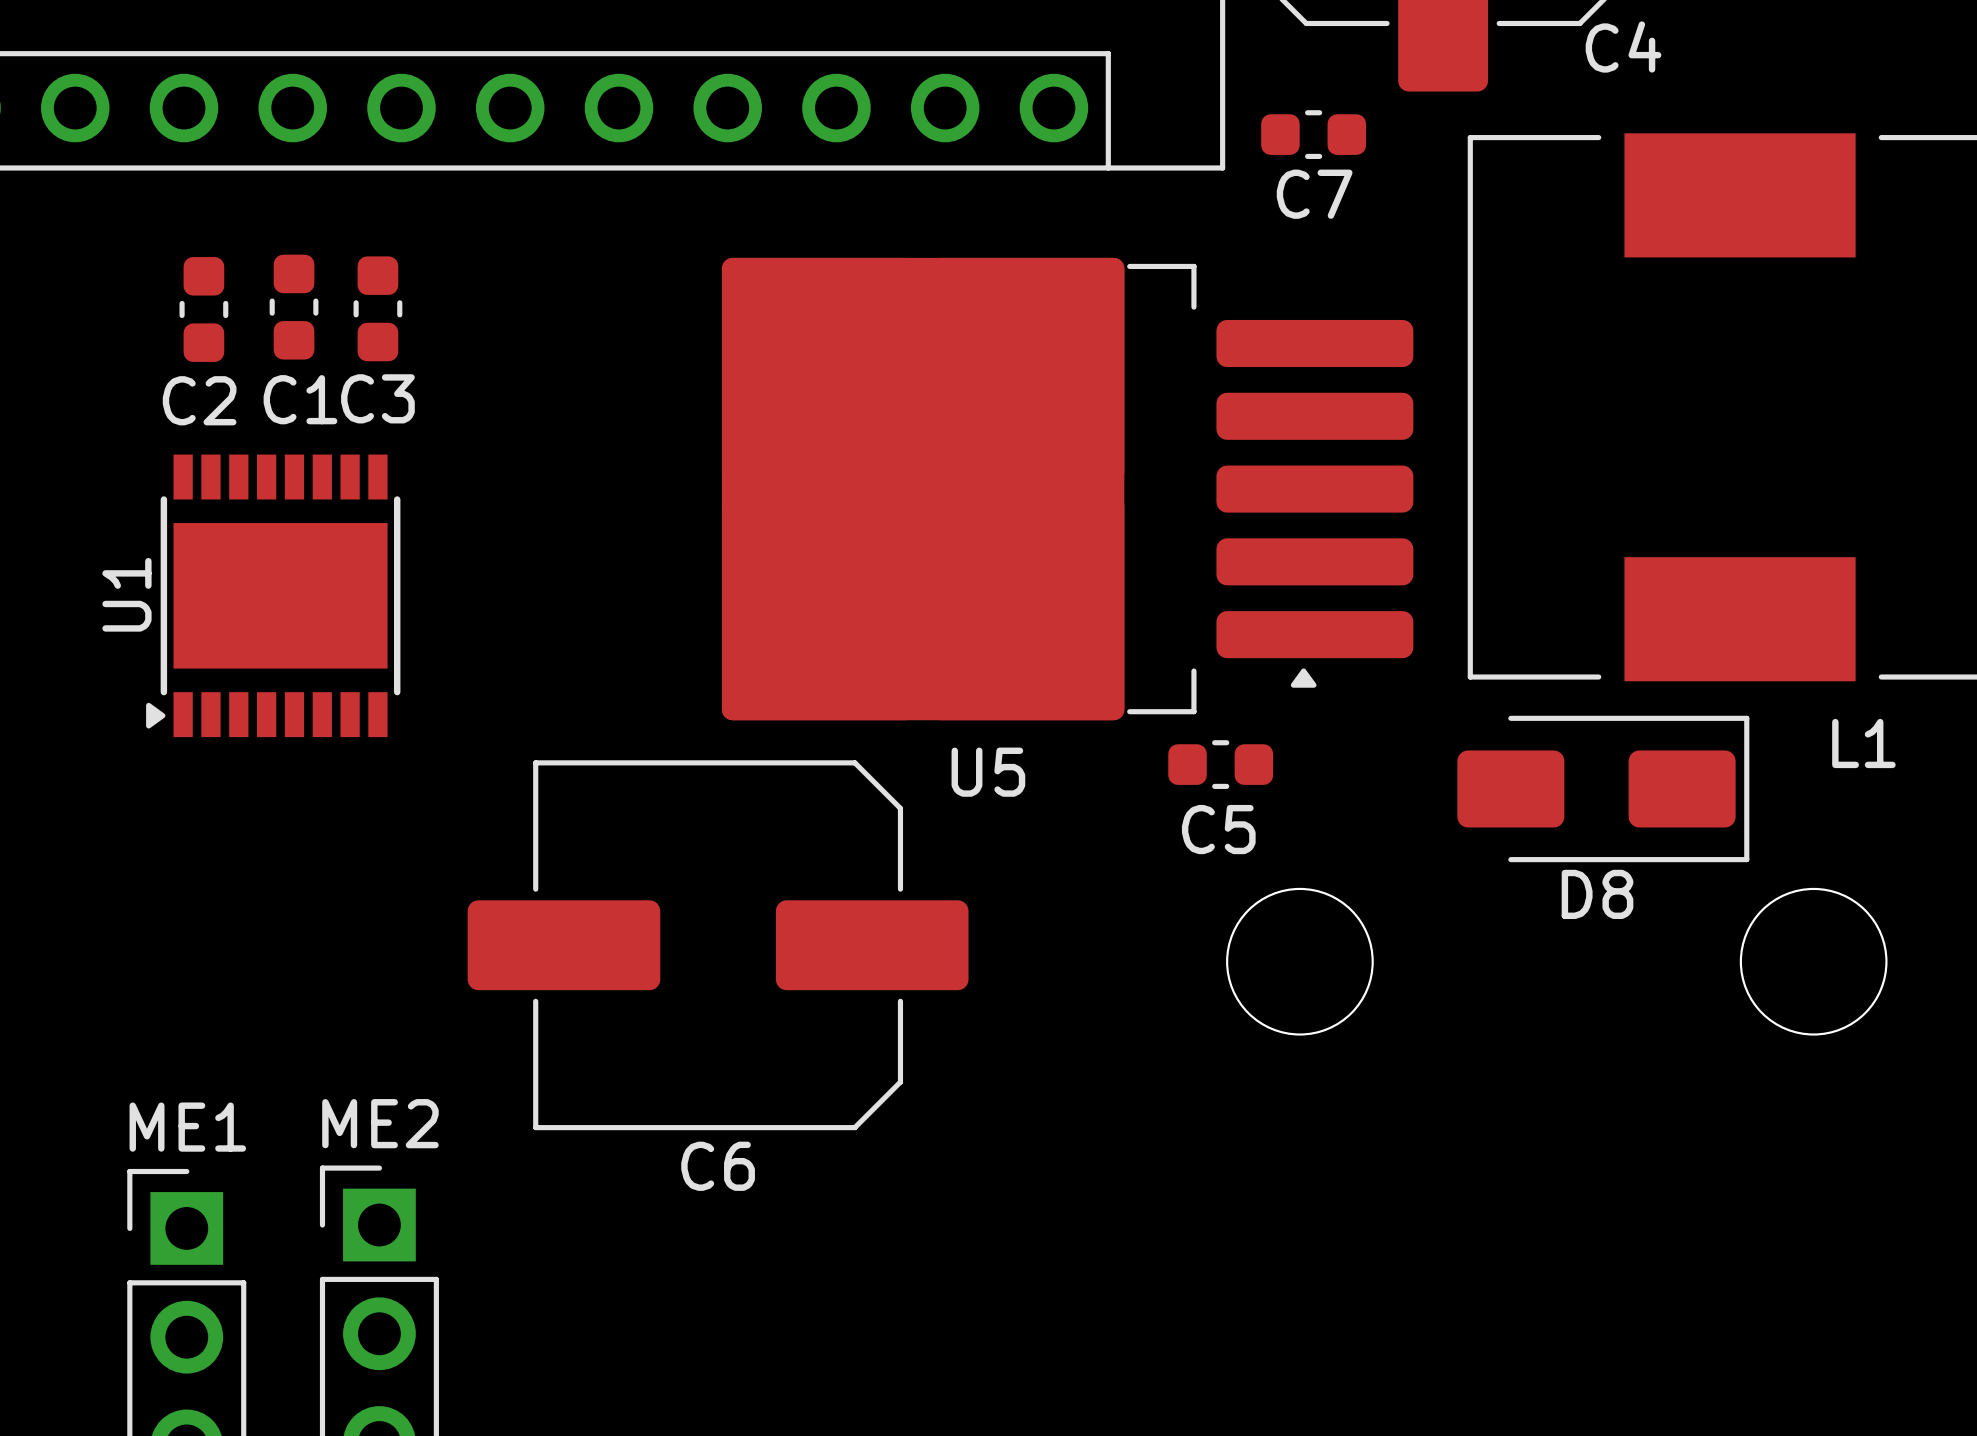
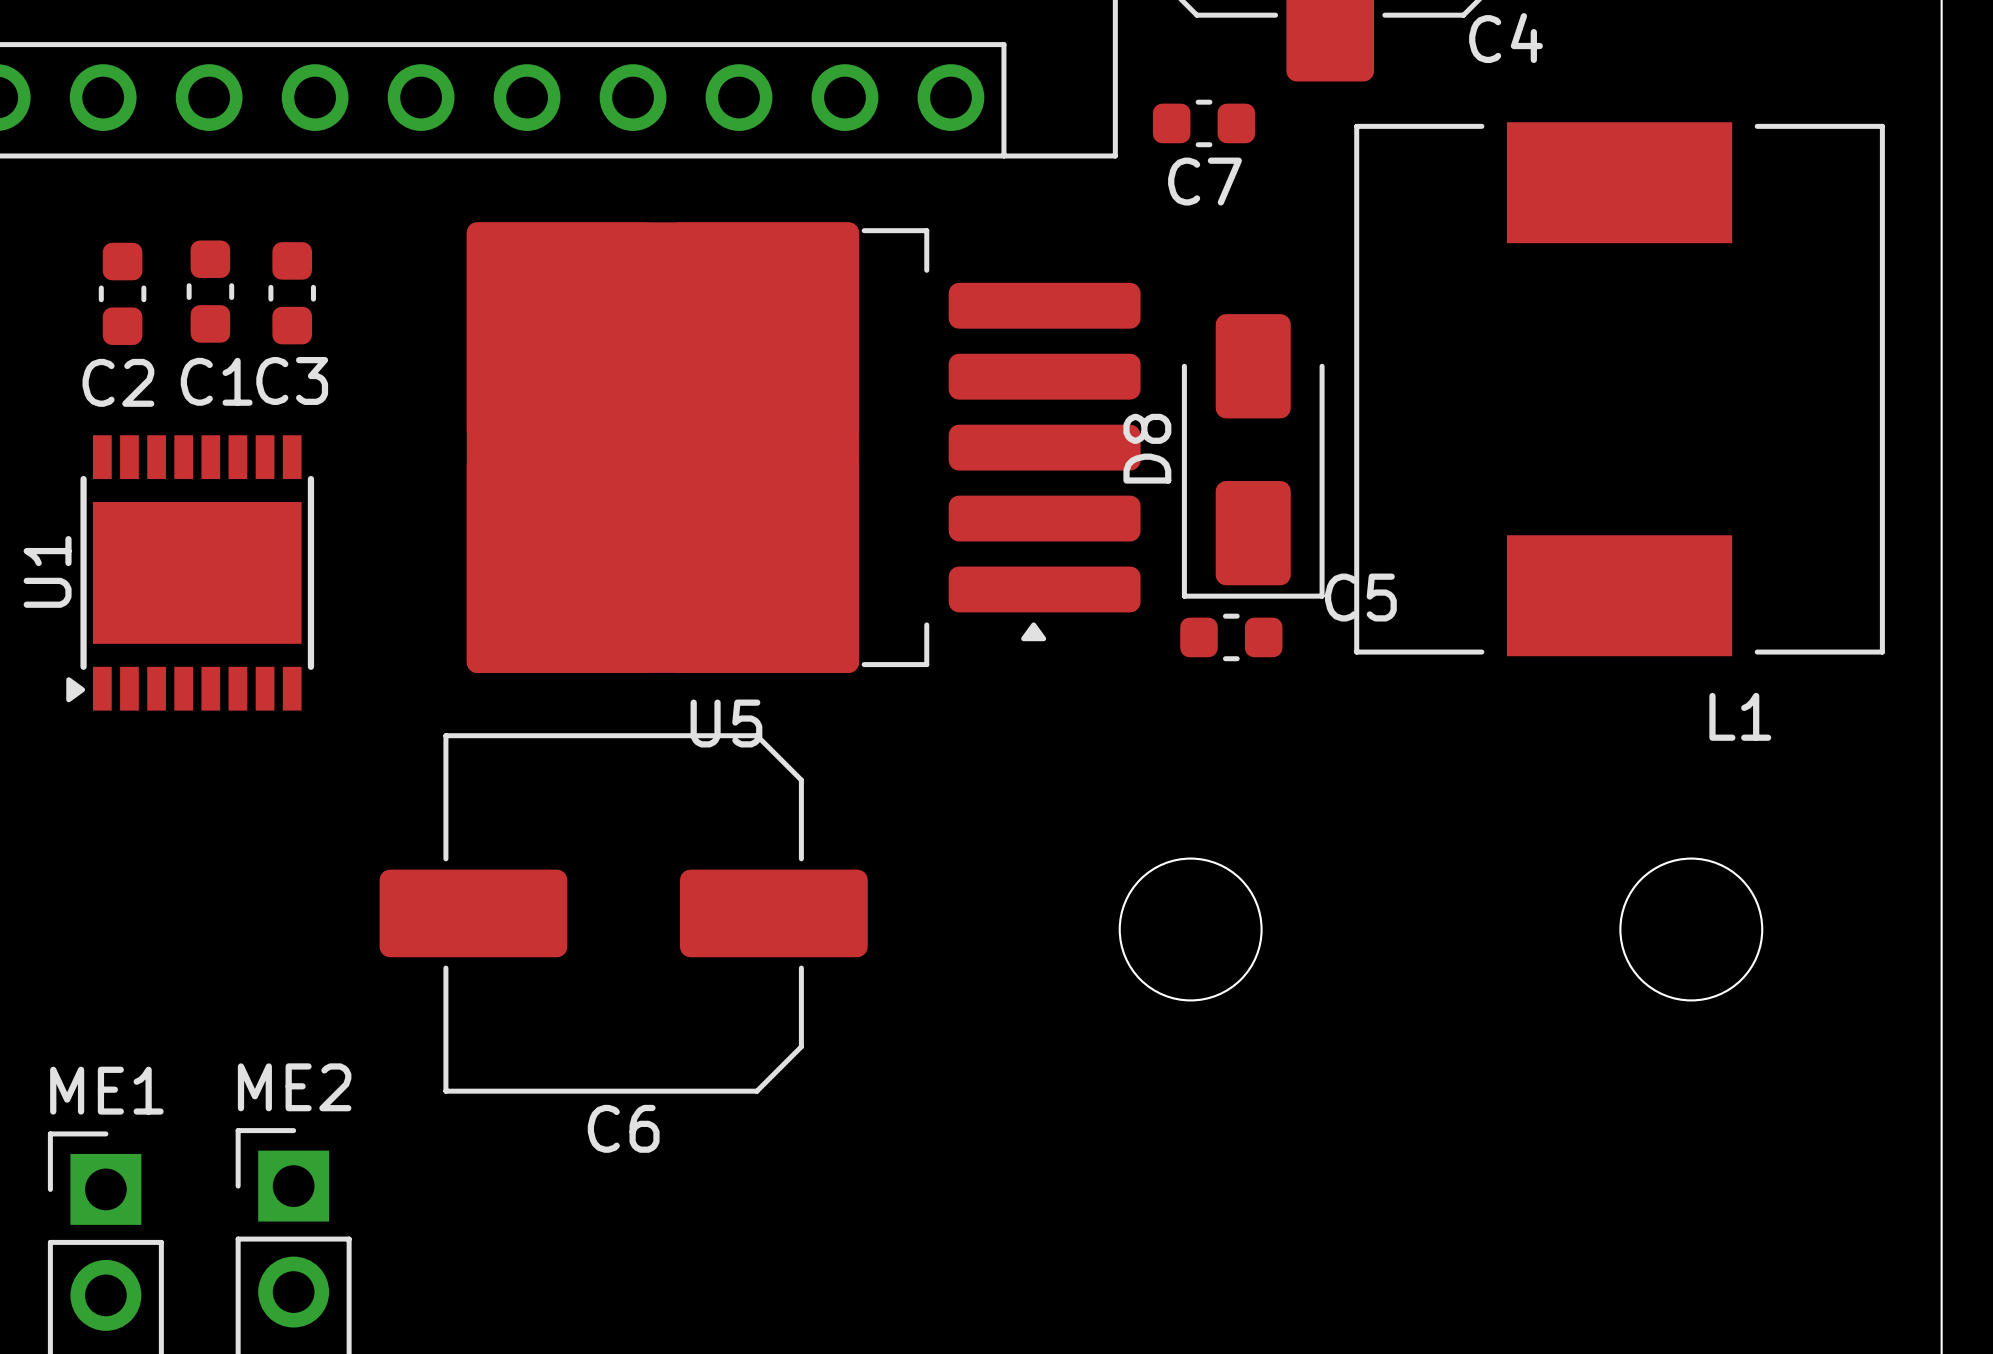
U5 position: (1067, 489) -> (803, 447)
C5 position: (1220, 764) -> (1231, 637)
D8 rotation: 0° (1603, 788) -> 90° clockwise (1253, 456)
D8 position: (1603, 788) -> (1253, 456)
C5 name position: C5 (1218, 829) -> C5 (1360, 597)

